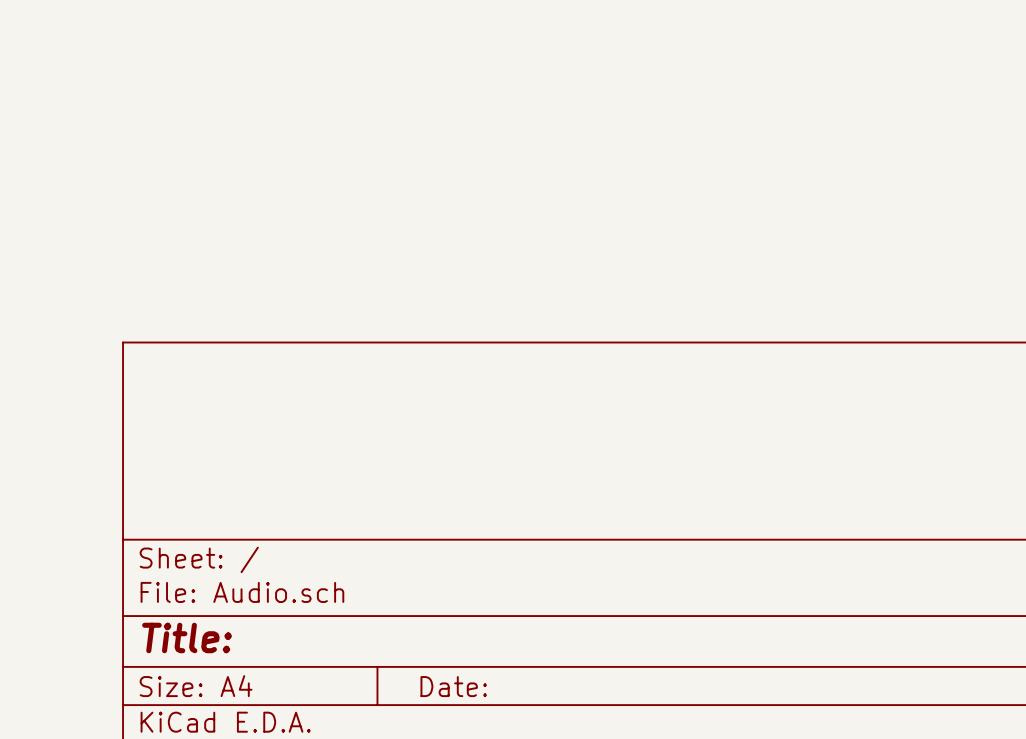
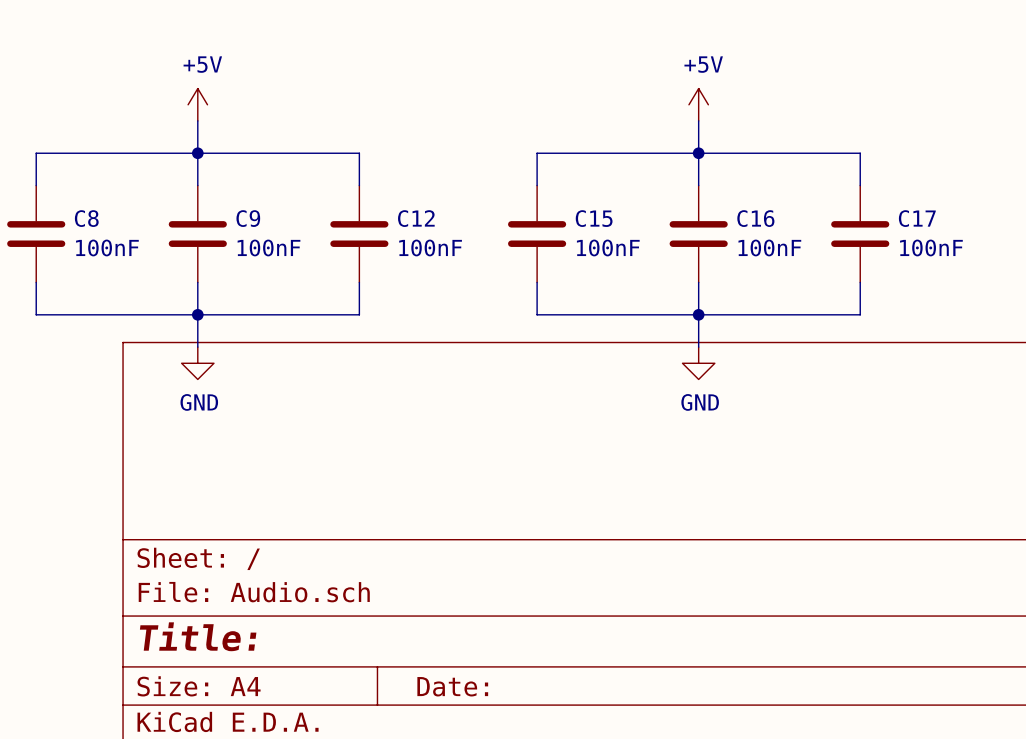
power symbol: none -> +5V (197, 104)
power symbol: none -> +5V (698, 104)
wire: none -> (197, 120) (197, 185)
wire: none -> (698, 120) (698, 185)
junction: none -> (197, 153)
junction: none -> (698, 153)
wire: none -> (36, 185) (36, 153) (359, 153) (359, 185)
wire: none -> (537, 185) (537, 153) (860, 153) (860, 185)
C8: none -> 100nF (36, 234)
C9: none -> 100nF (197, 234)
C12: none -> 100nF (359, 234)
C15: none -> 100nF (537, 234)
C16: none -> 100nF (698, 234)
C17: none -> 100nF (860, 234)
wire: none -> (36, 282) (36, 314) (359, 314) (359, 282)
wire: none -> (197, 282) (197, 347)
wire: none -> (537, 282) (537, 314) (860, 314) (860, 282)
wire: none -> (698, 282) (698, 347)
junction: none -> (197, 314)
junction: none -> (698, 314)
power symbol: none -> GND (197, 363)
power symbol: none -> GND (698, 363)

